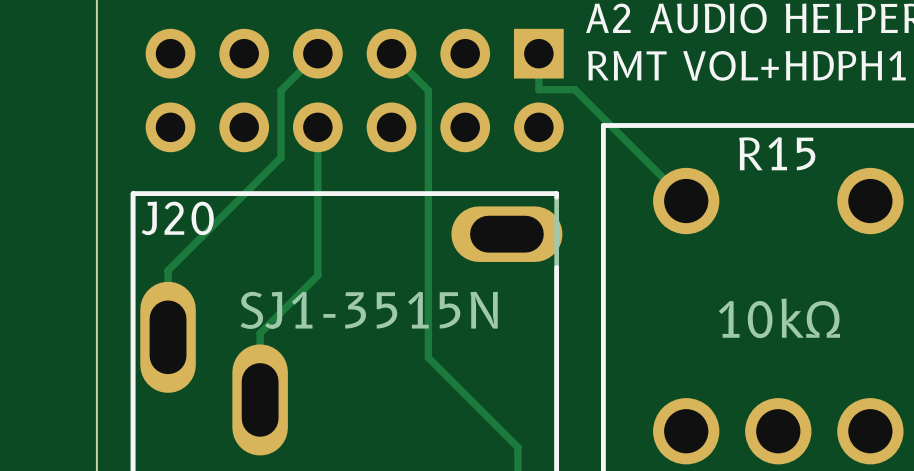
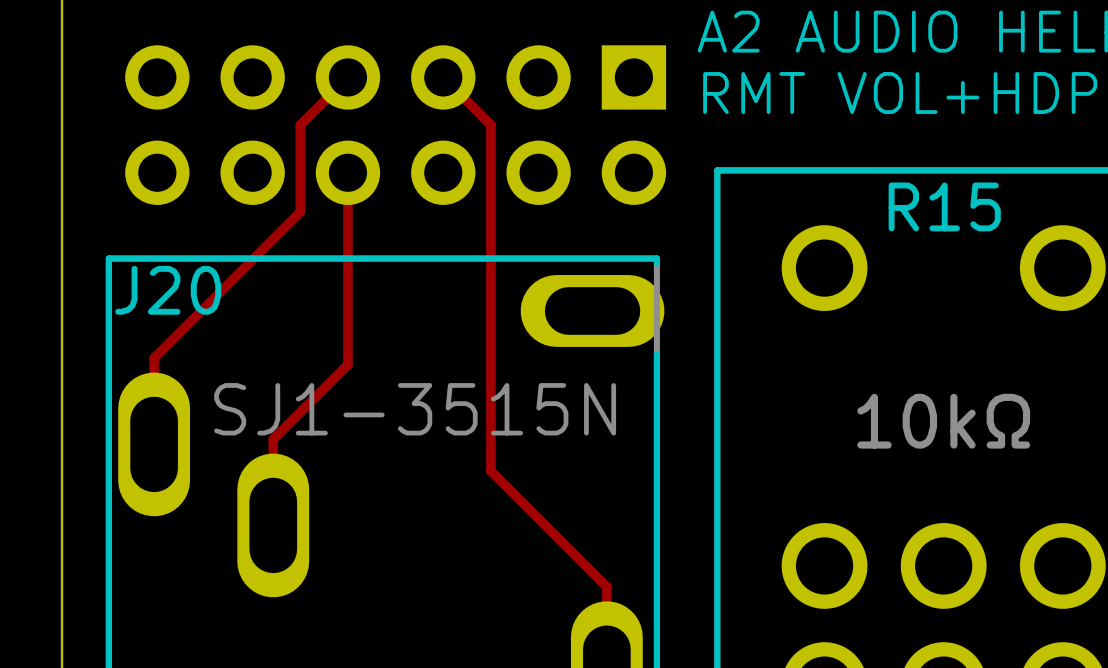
track: (538, 53) (538, 89) (574, 89) (686, 201) -> none

